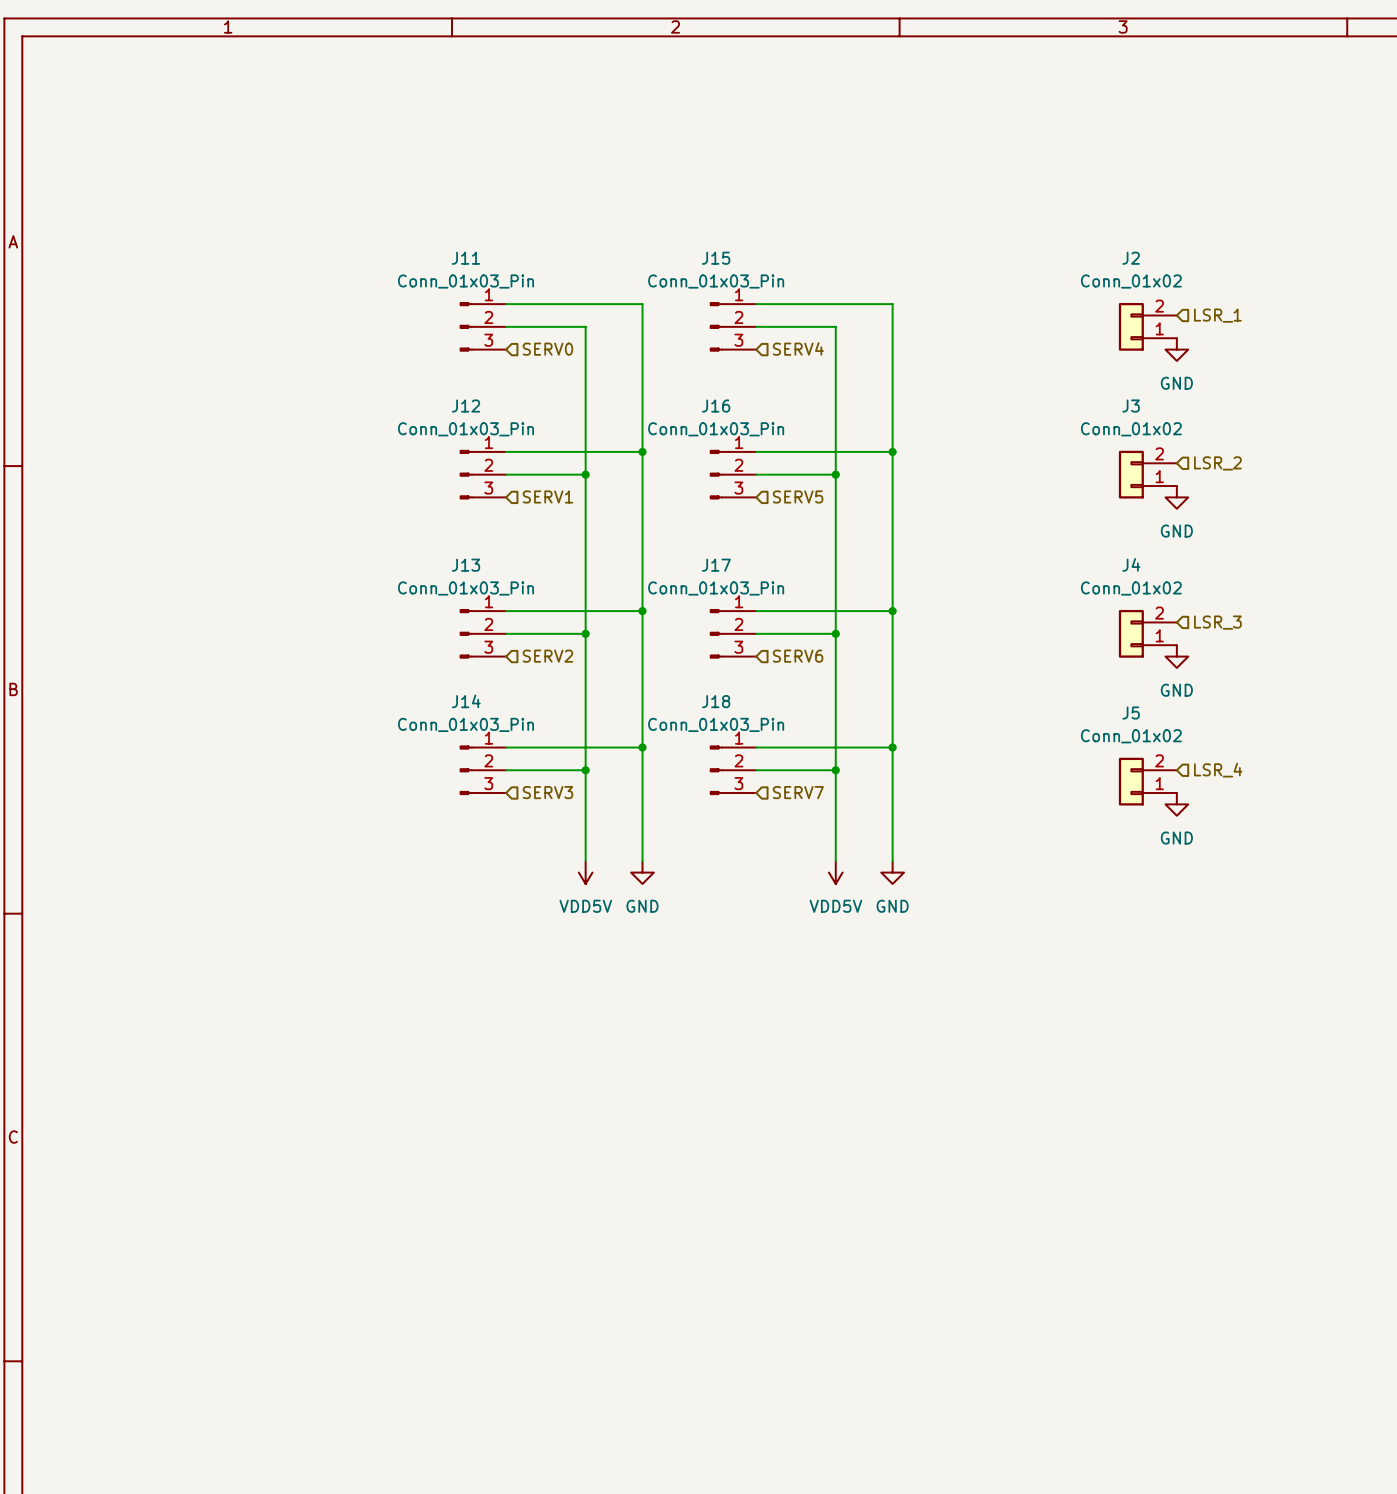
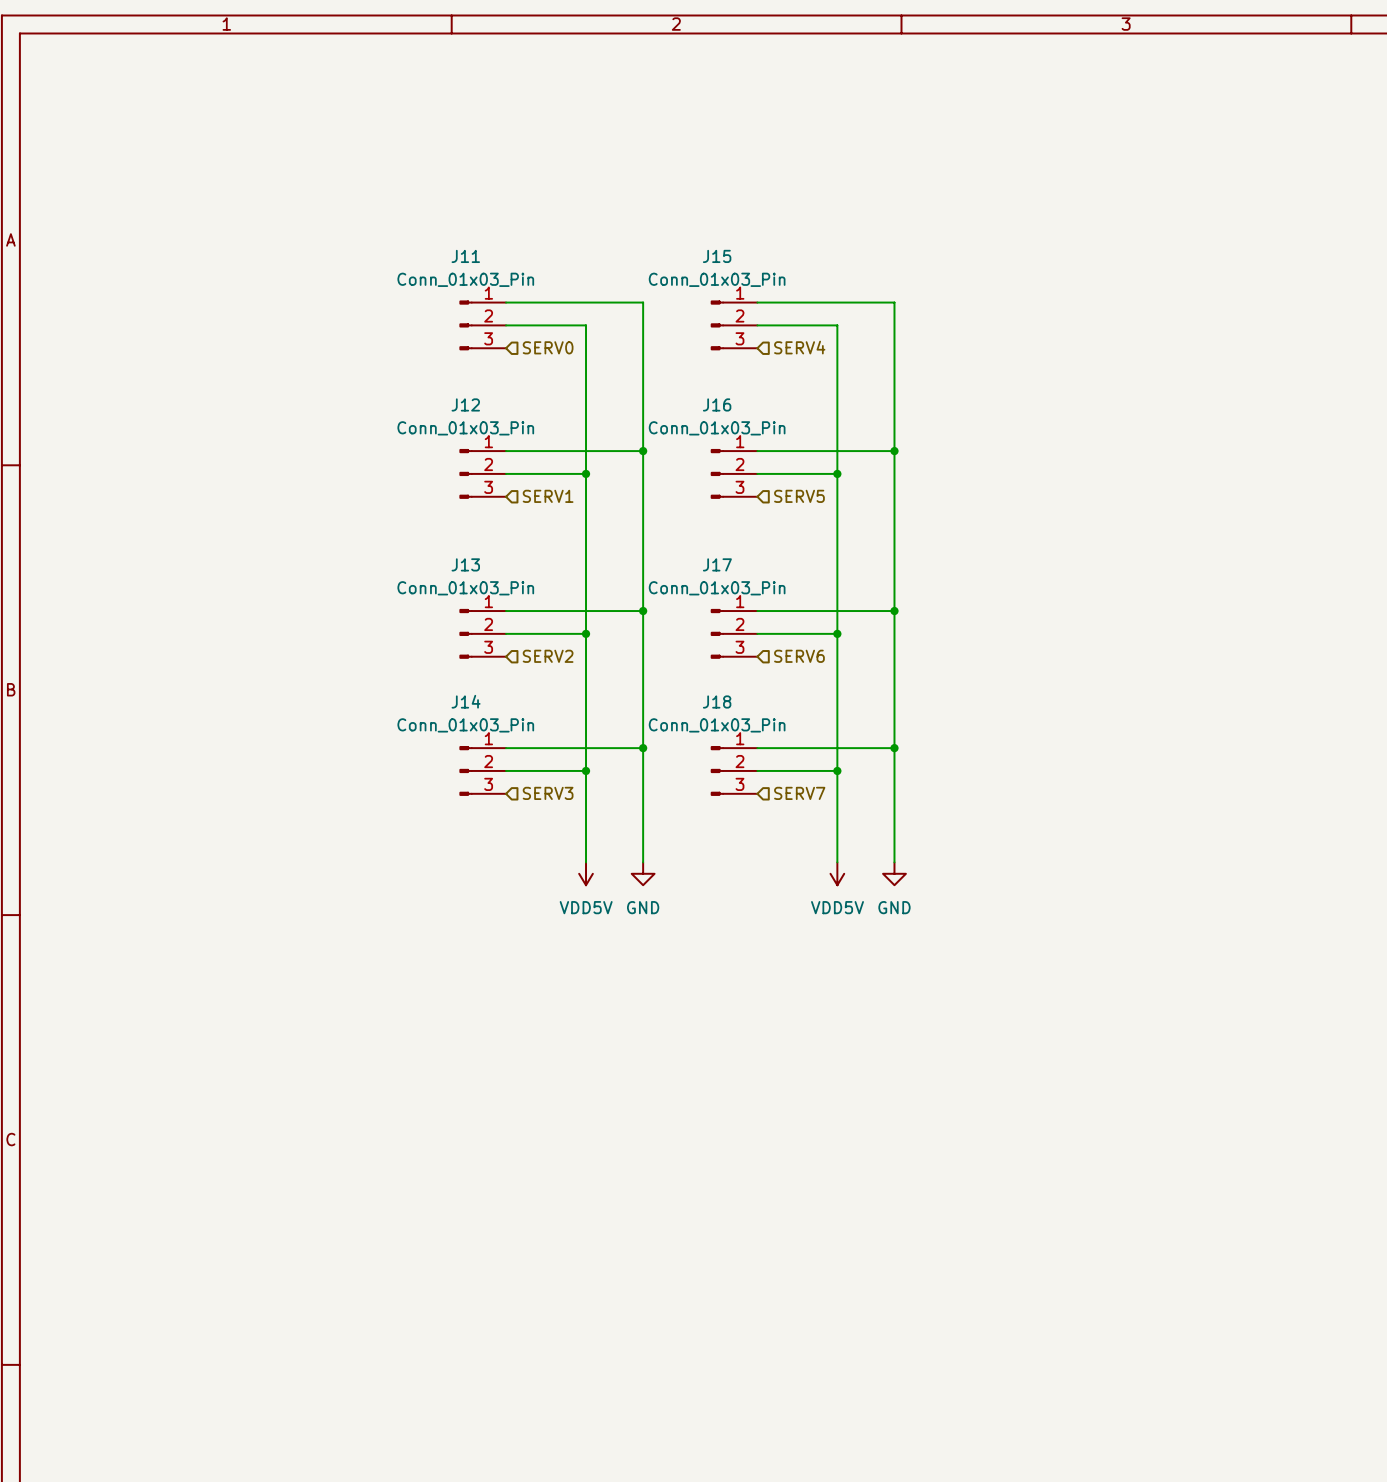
hierarchical label: LSR_1 (1217, 315) -> none
J2: Conn_01x02 (1147, 326) -> none
power symbol: GND (1176, 349) -> none
hierarchical label: LSR_2 (1217, 463) -> none
J3: Conn_01x02 (1147, 474) -> none
power symbol: GND (1176, 497) -> none
hierarchical label: LSR_3 (1217, 622) -> none
J4: Conn_01x02 (1147, 633) -> none
power symbol: GND (1176, 656) -> none
hierarchical label: LSR_4 (1218, 770) -> none
J5: Conn_01x02 (1147, 781) -> none
power symbol: GND (1176, 804) -> none

